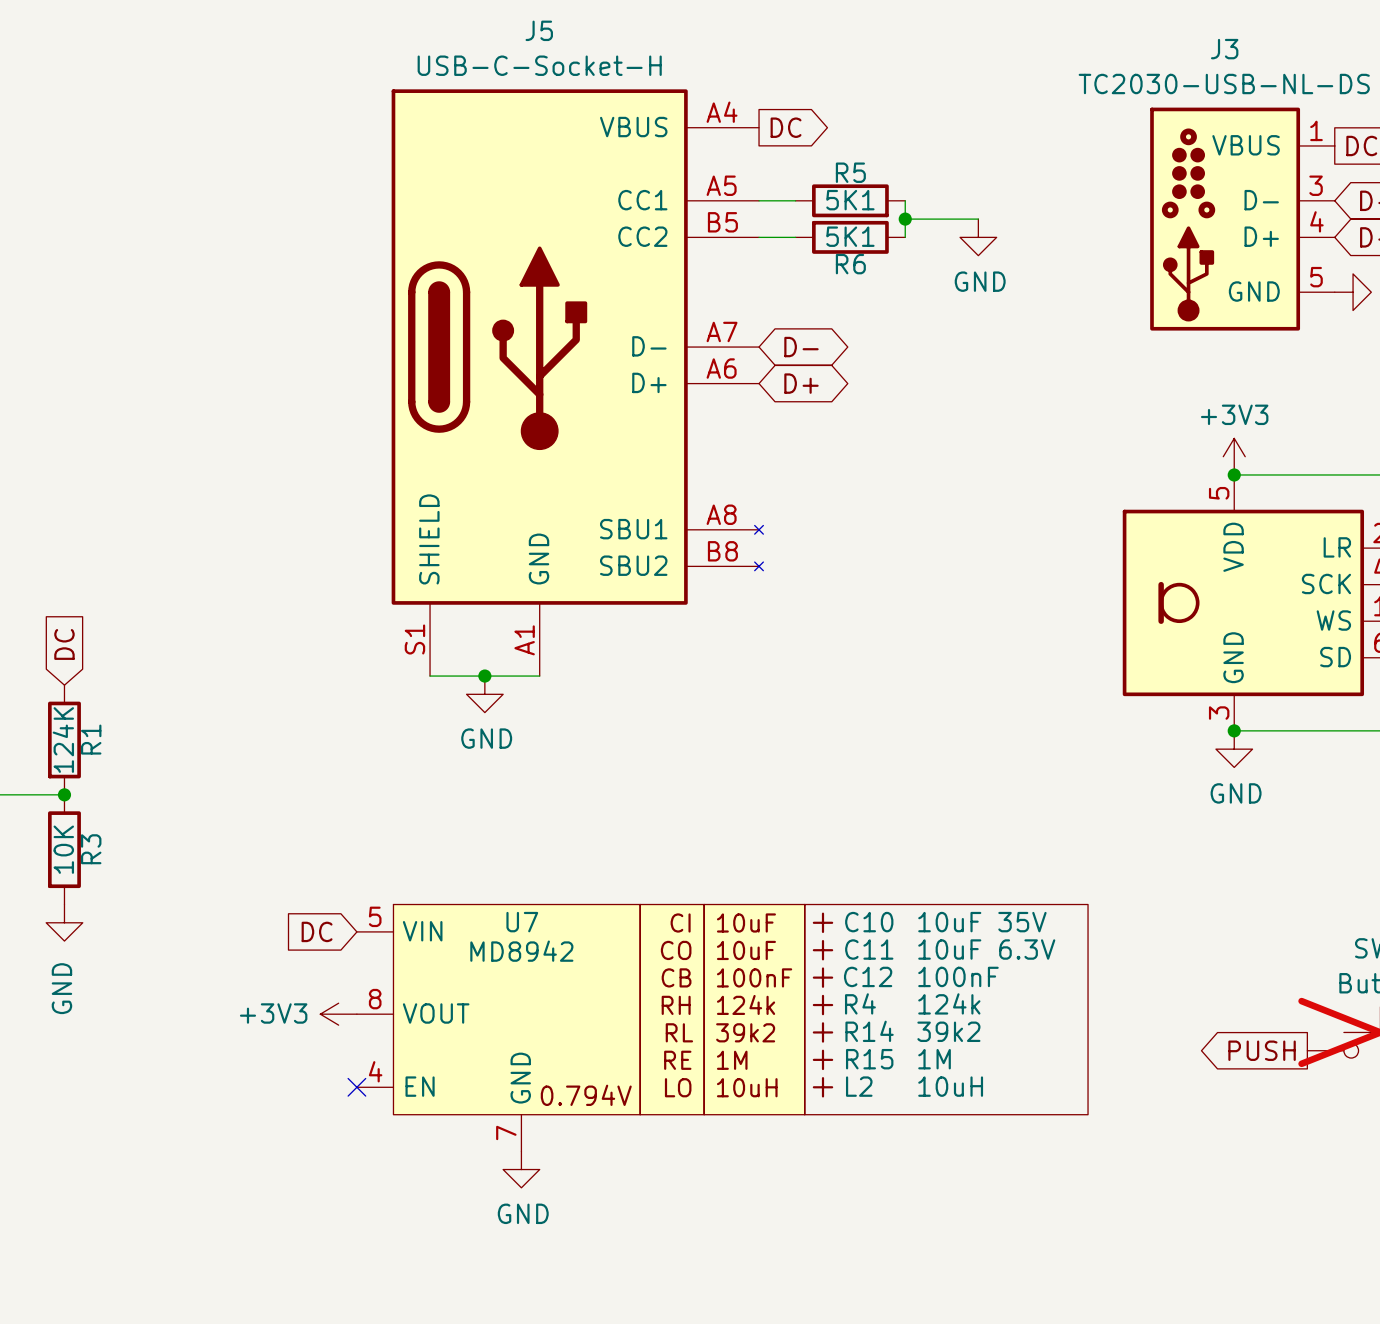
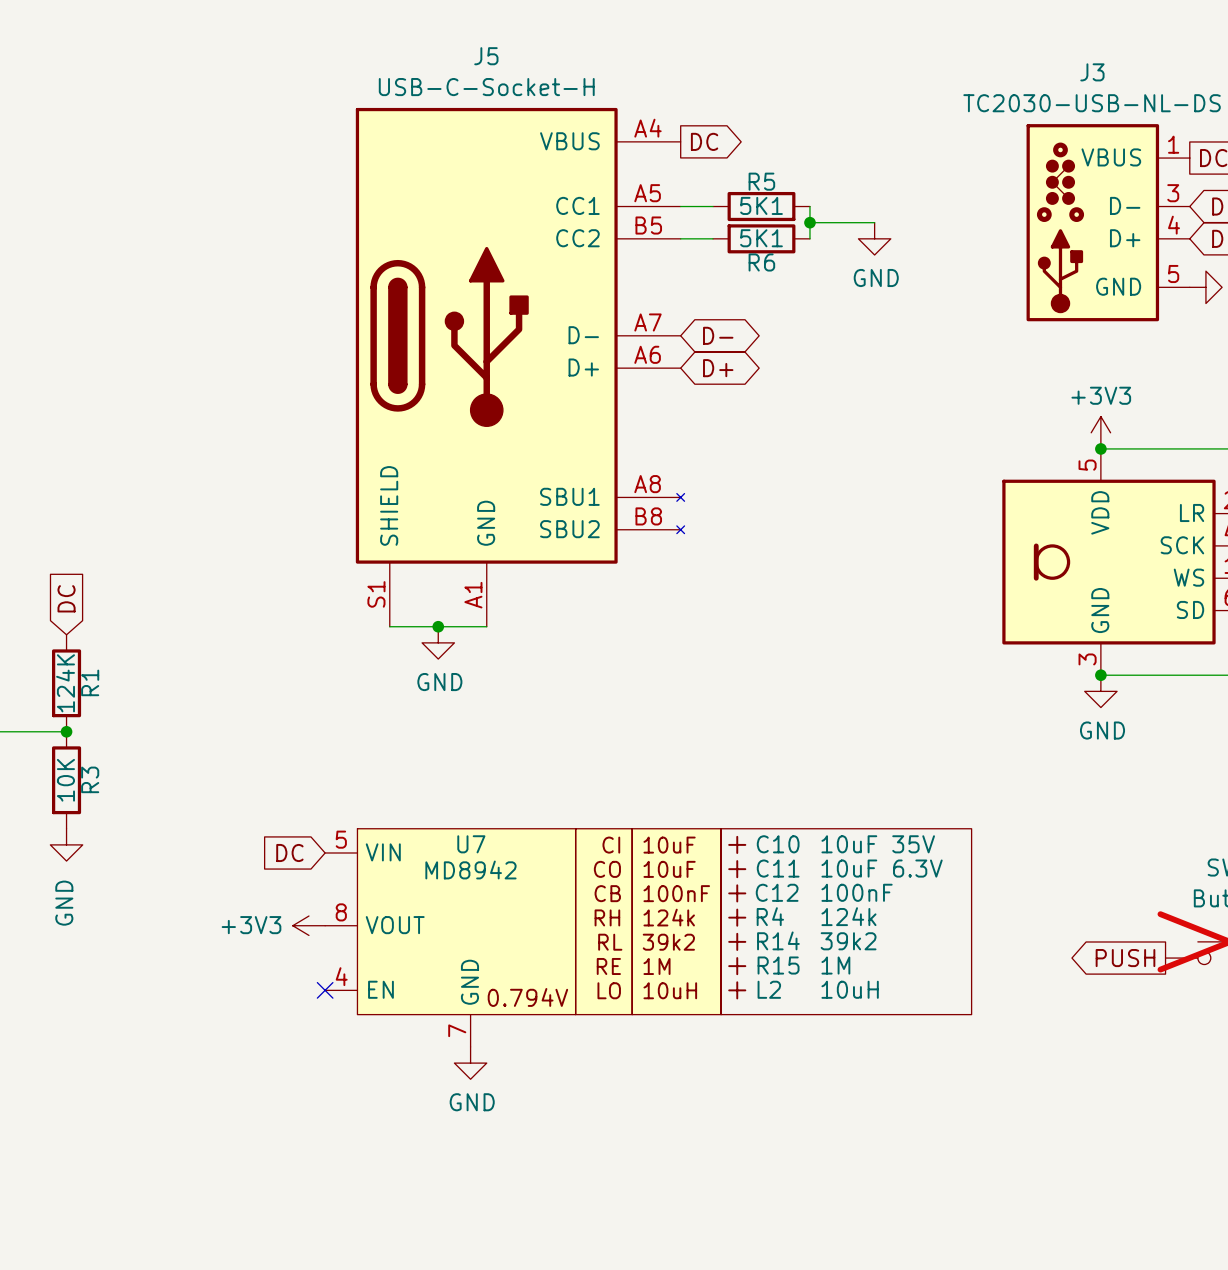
J3 symbol: [1150, 107, 1335, 331] -> [1026, 124, 1190, 322]

